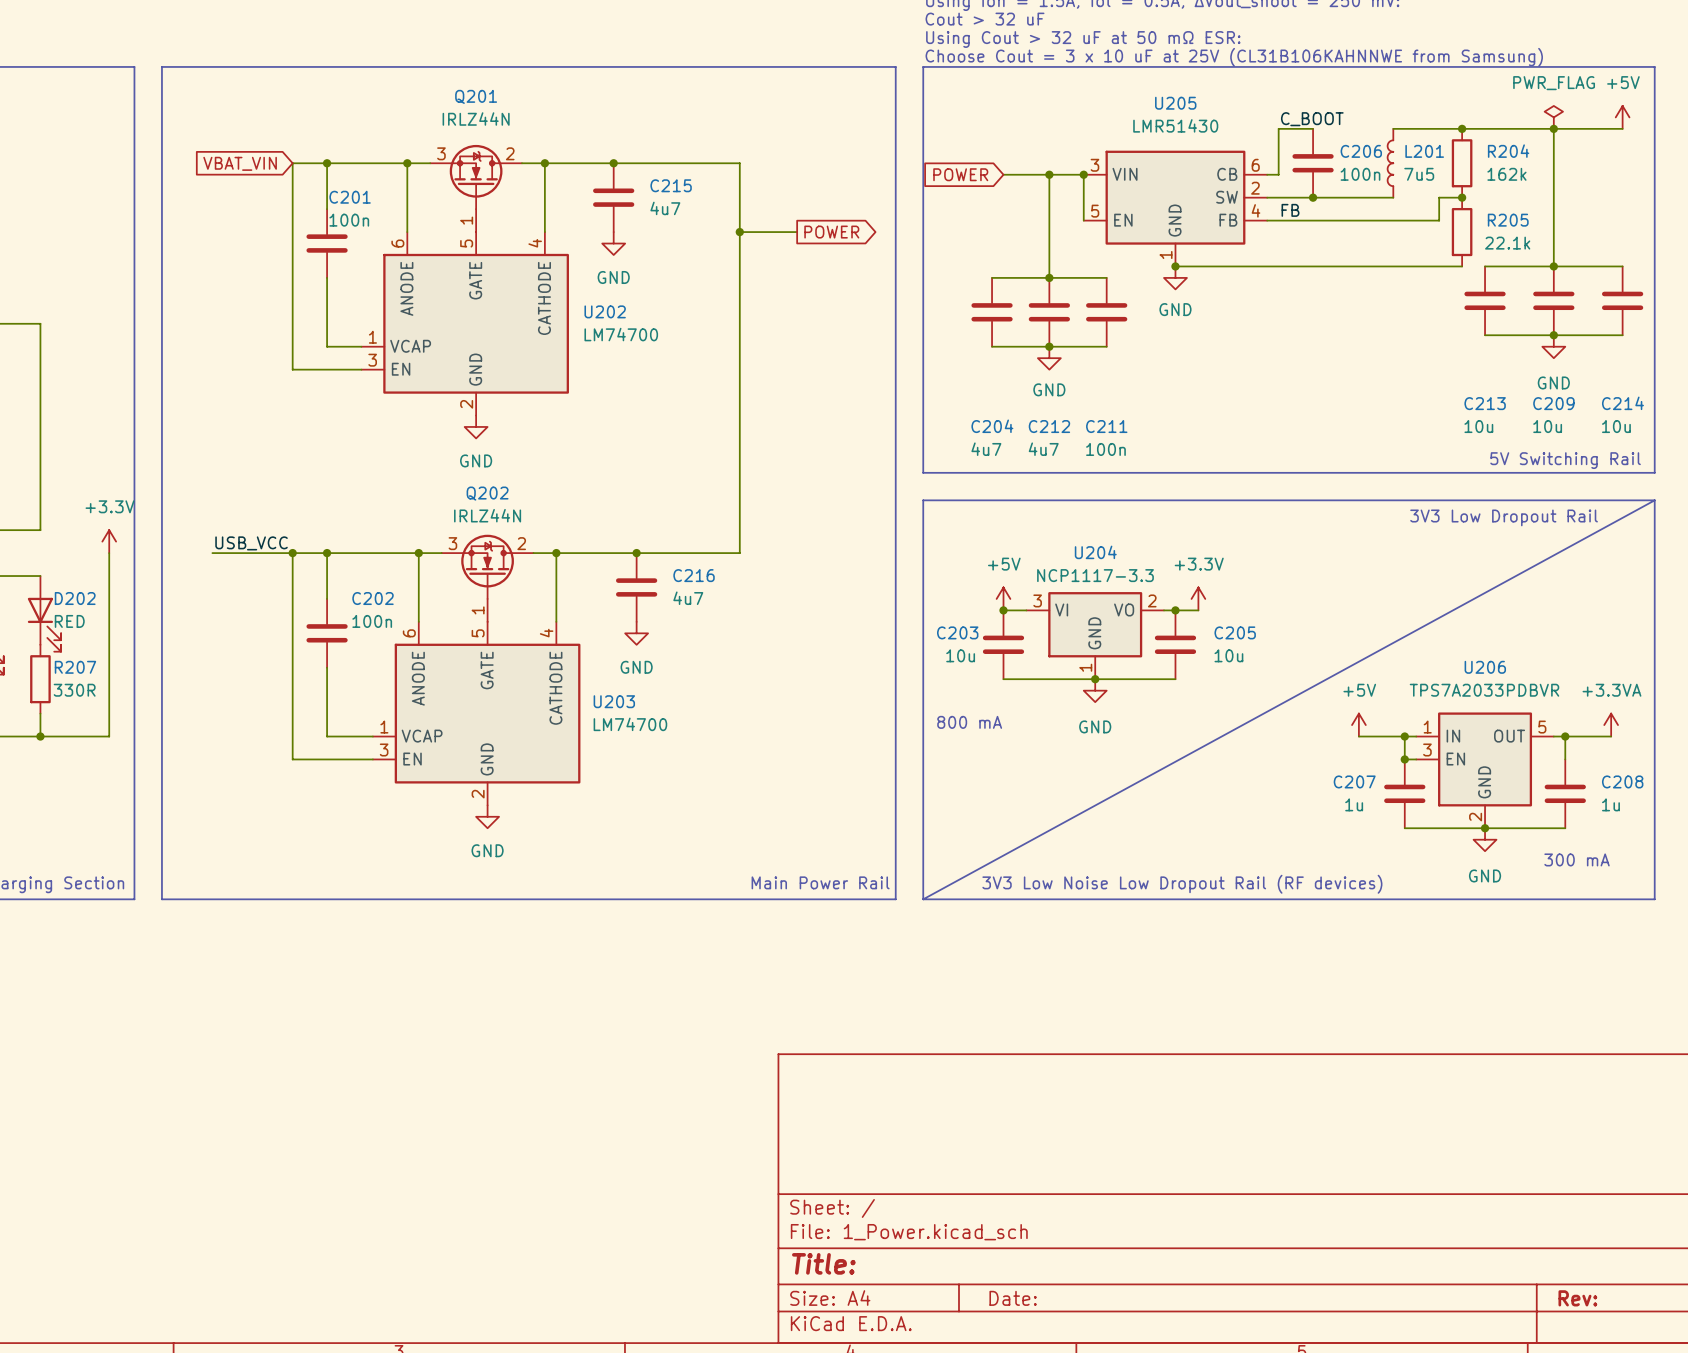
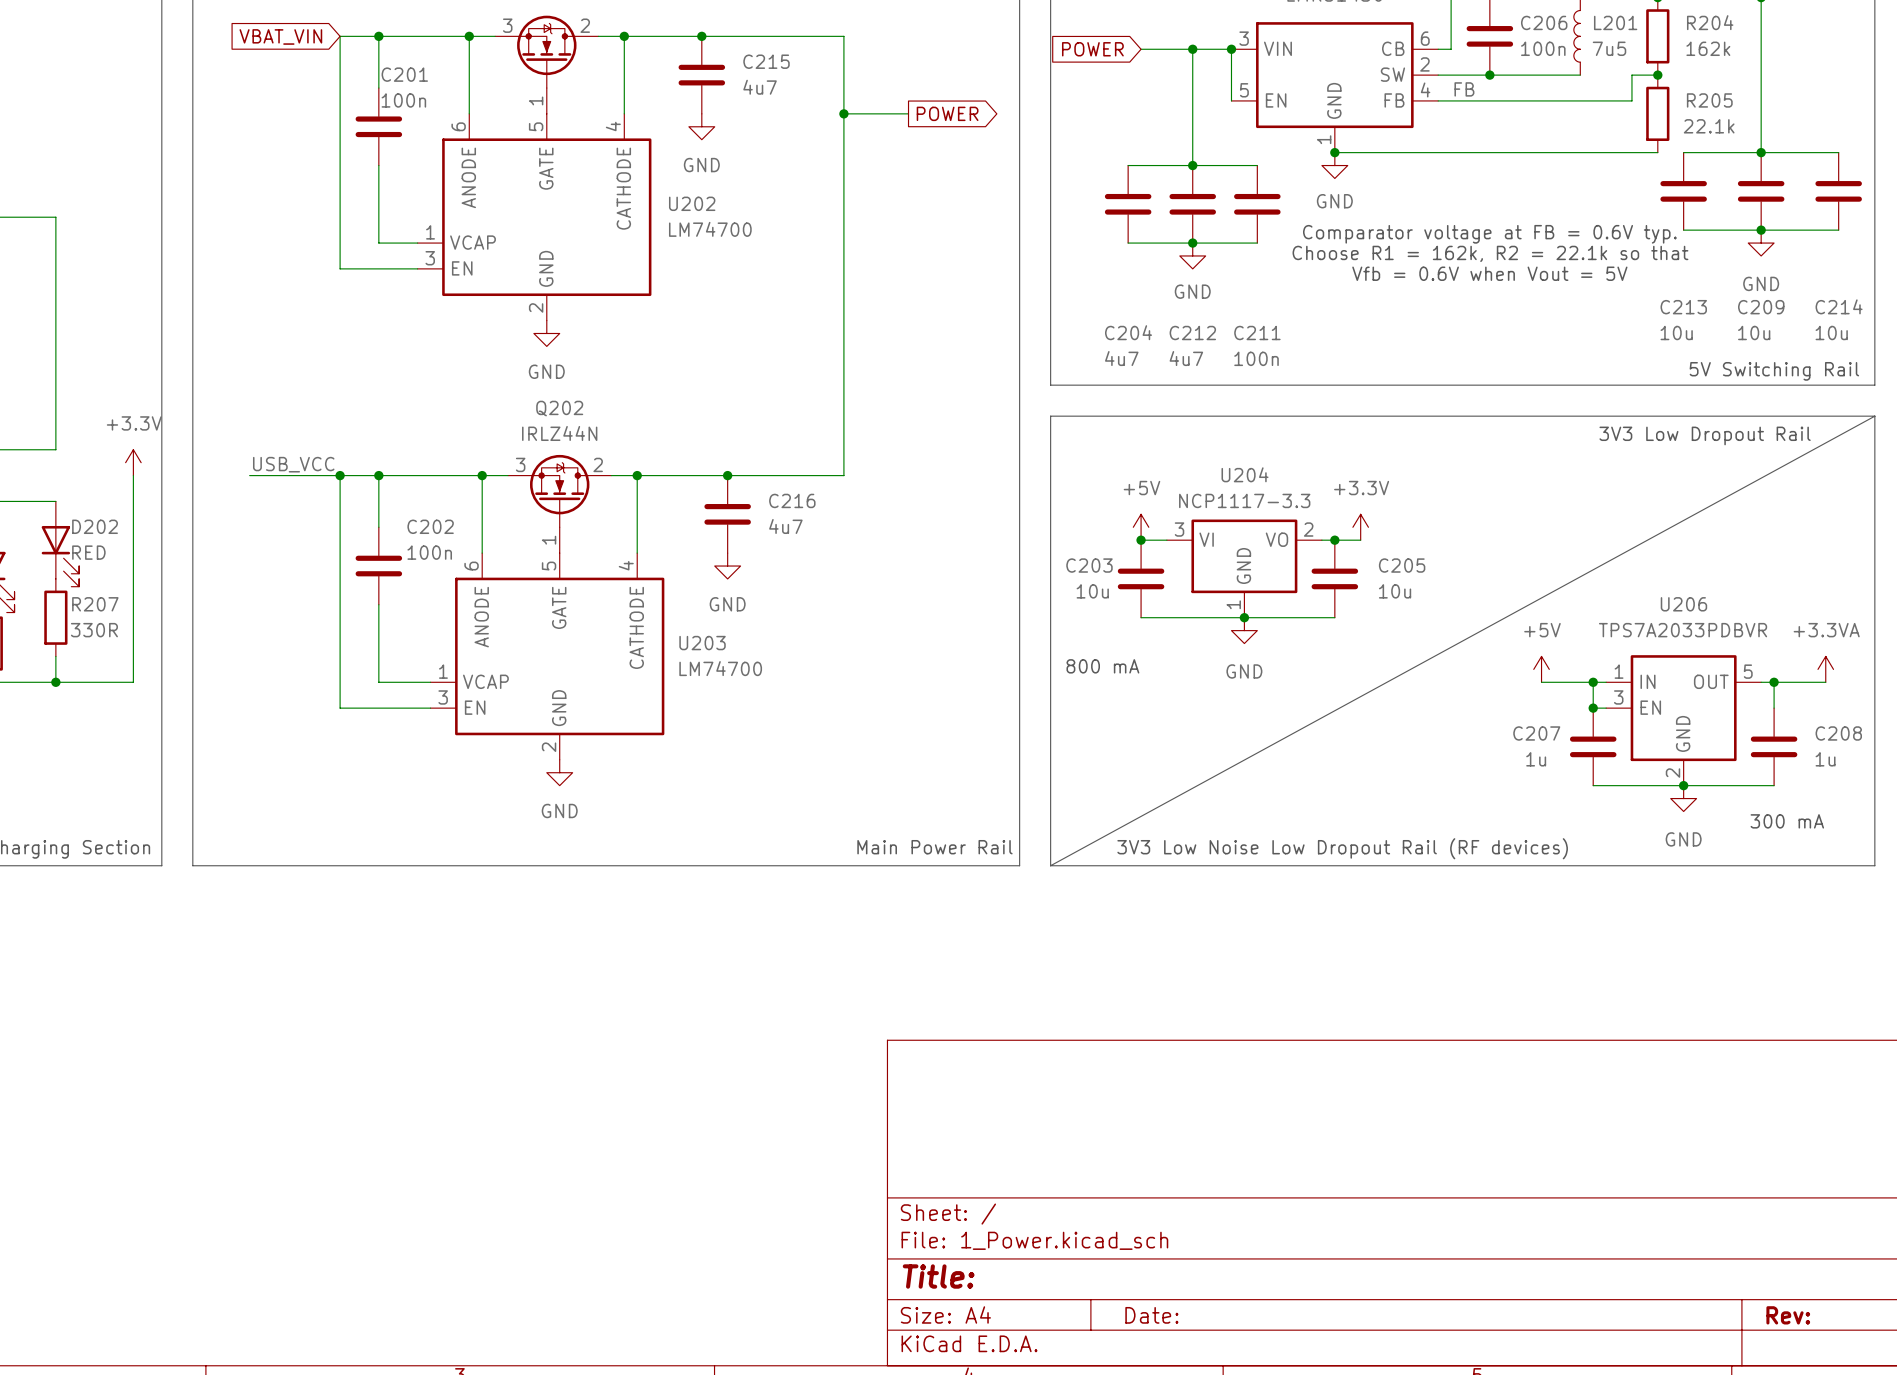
text: none -> Comparator voltage at FB = 0.6V typ. (1489, 234)
text: none -> Choose R1 = 162k, R2 = 22.1k so that (1490, 253)
text: none -> Vfb = 0.6V when Vout = 5V (1489, 273)

